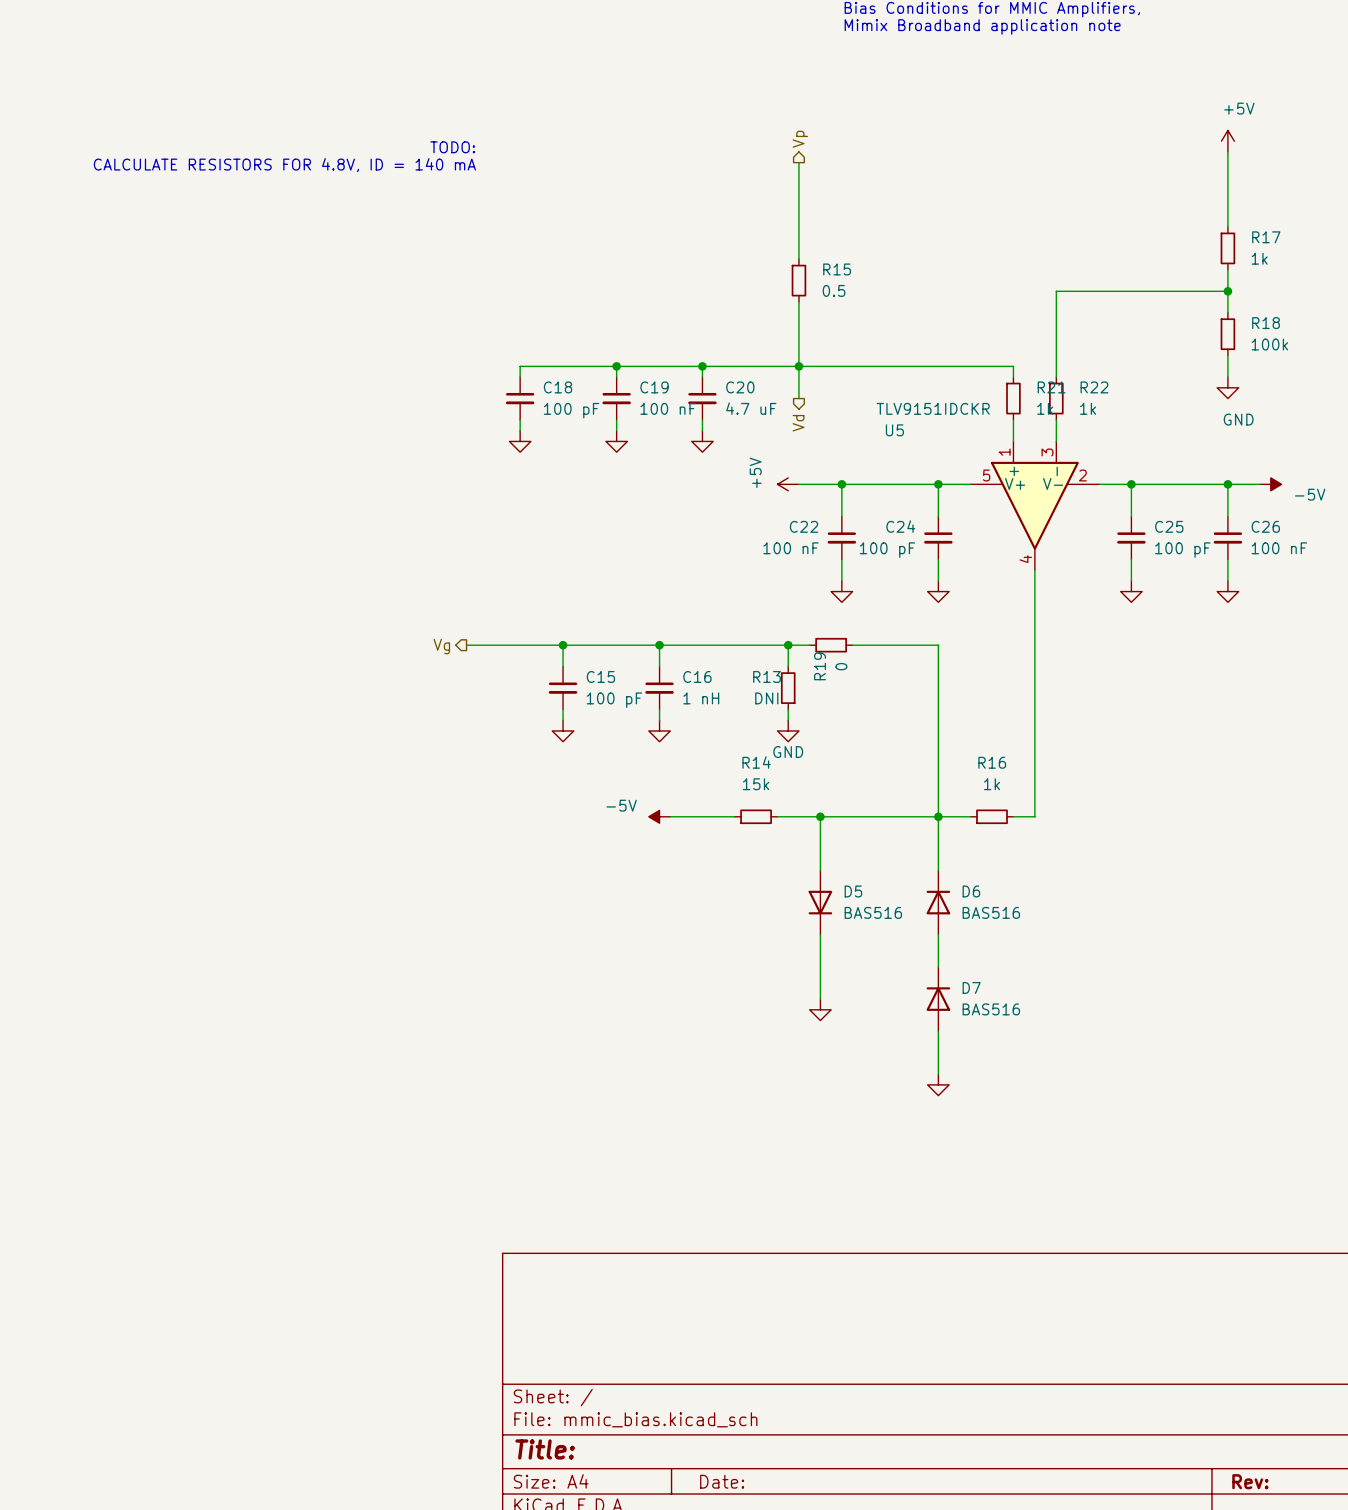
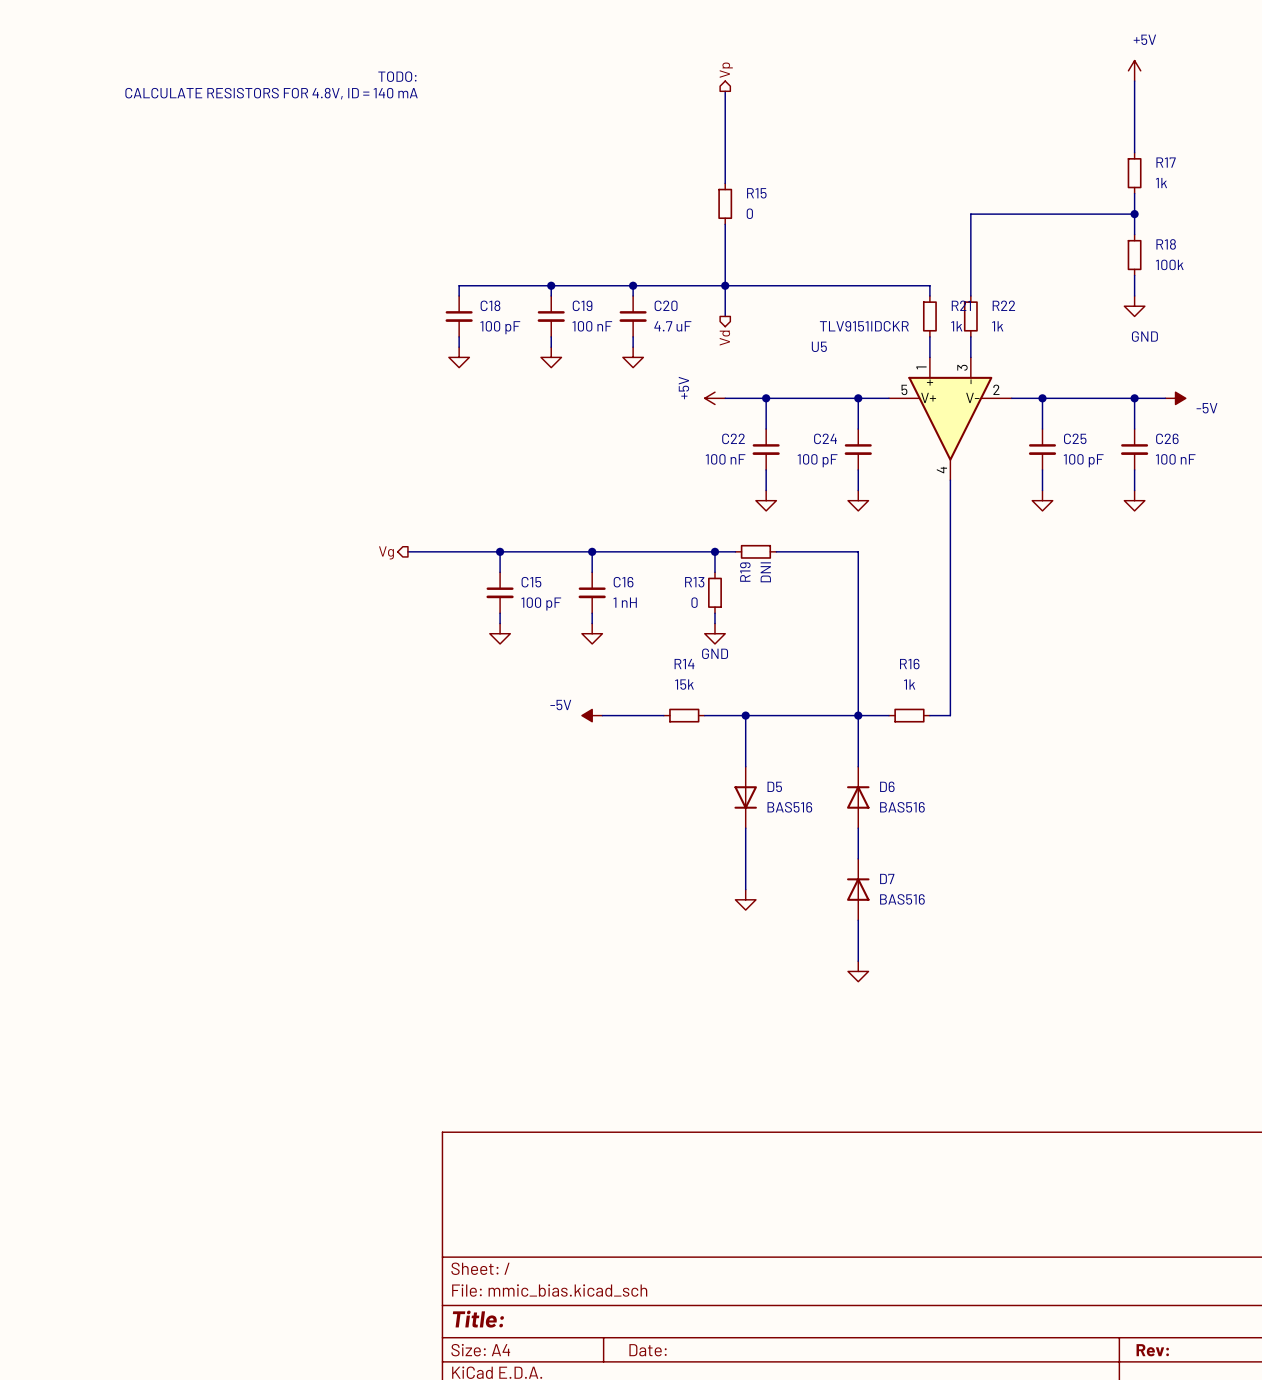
R15 value: 0.5 (834, 290) -> 0 (749, 213)
R19 value: 0 (841, 666) -> DNI (765, 572)
R13 value: DNI (766, 698) -> 0 (694, 602)

